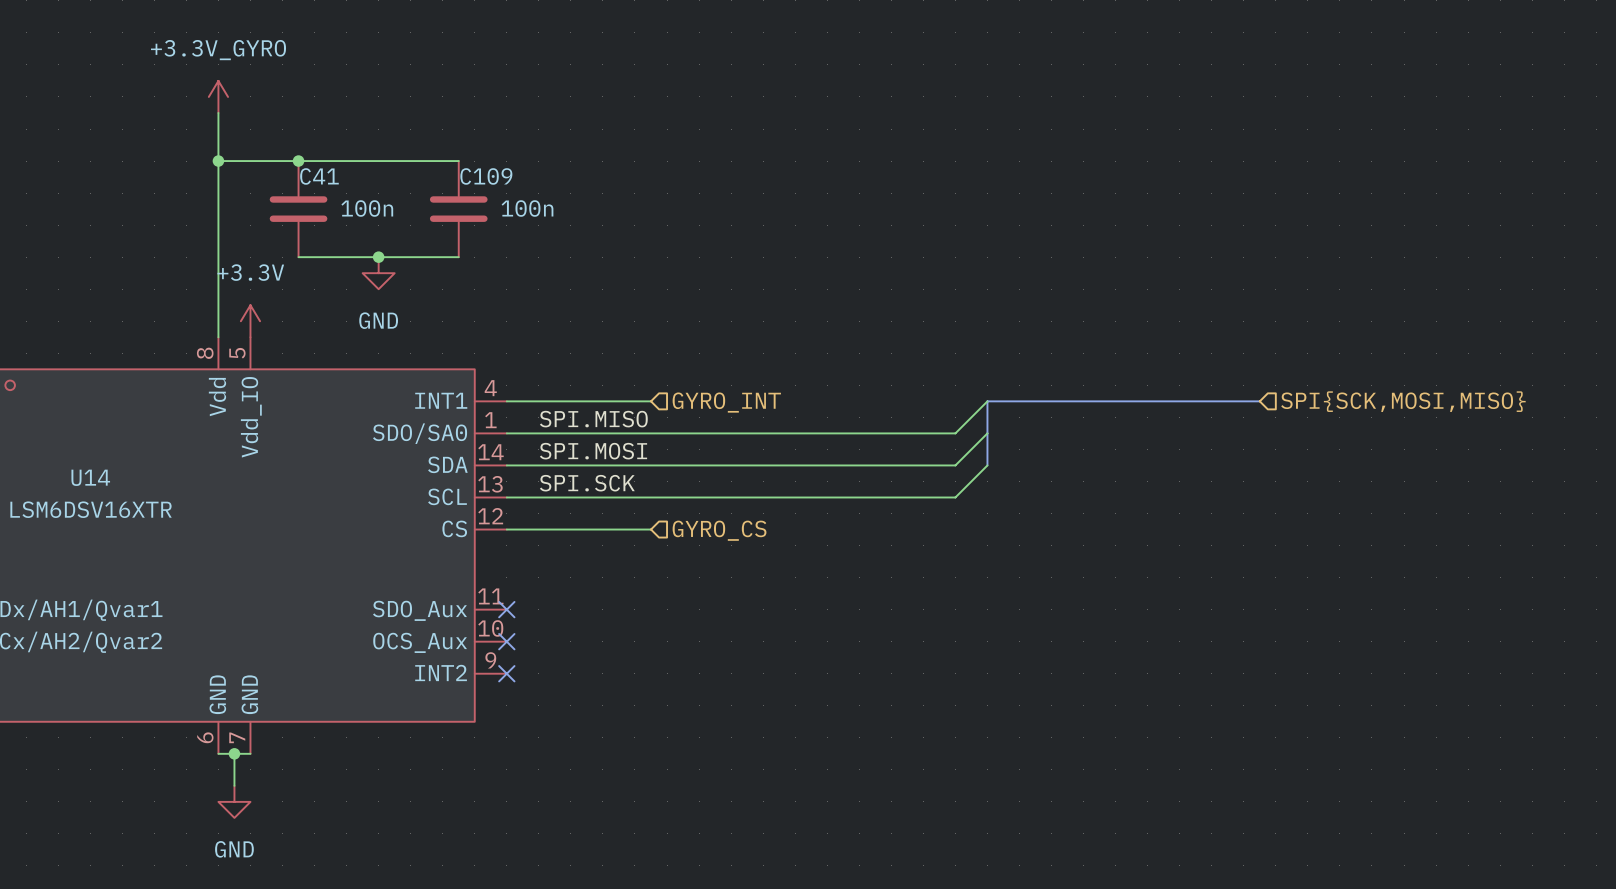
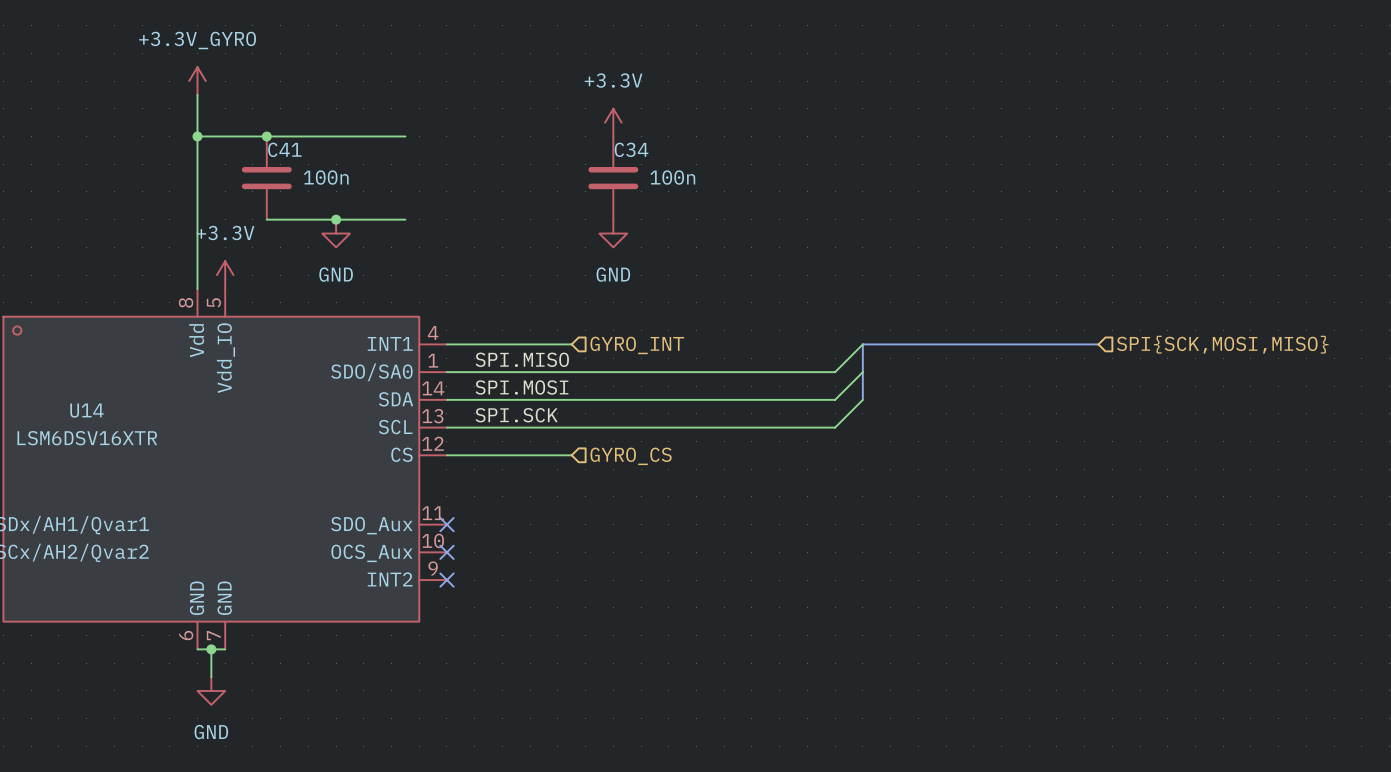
power symbol: none -> +3.3V (613, 122)
C109: 100n (458, 209) -> none
C34: none -> 100n (613, 178)
power symbol: none -> GND (613, 233)

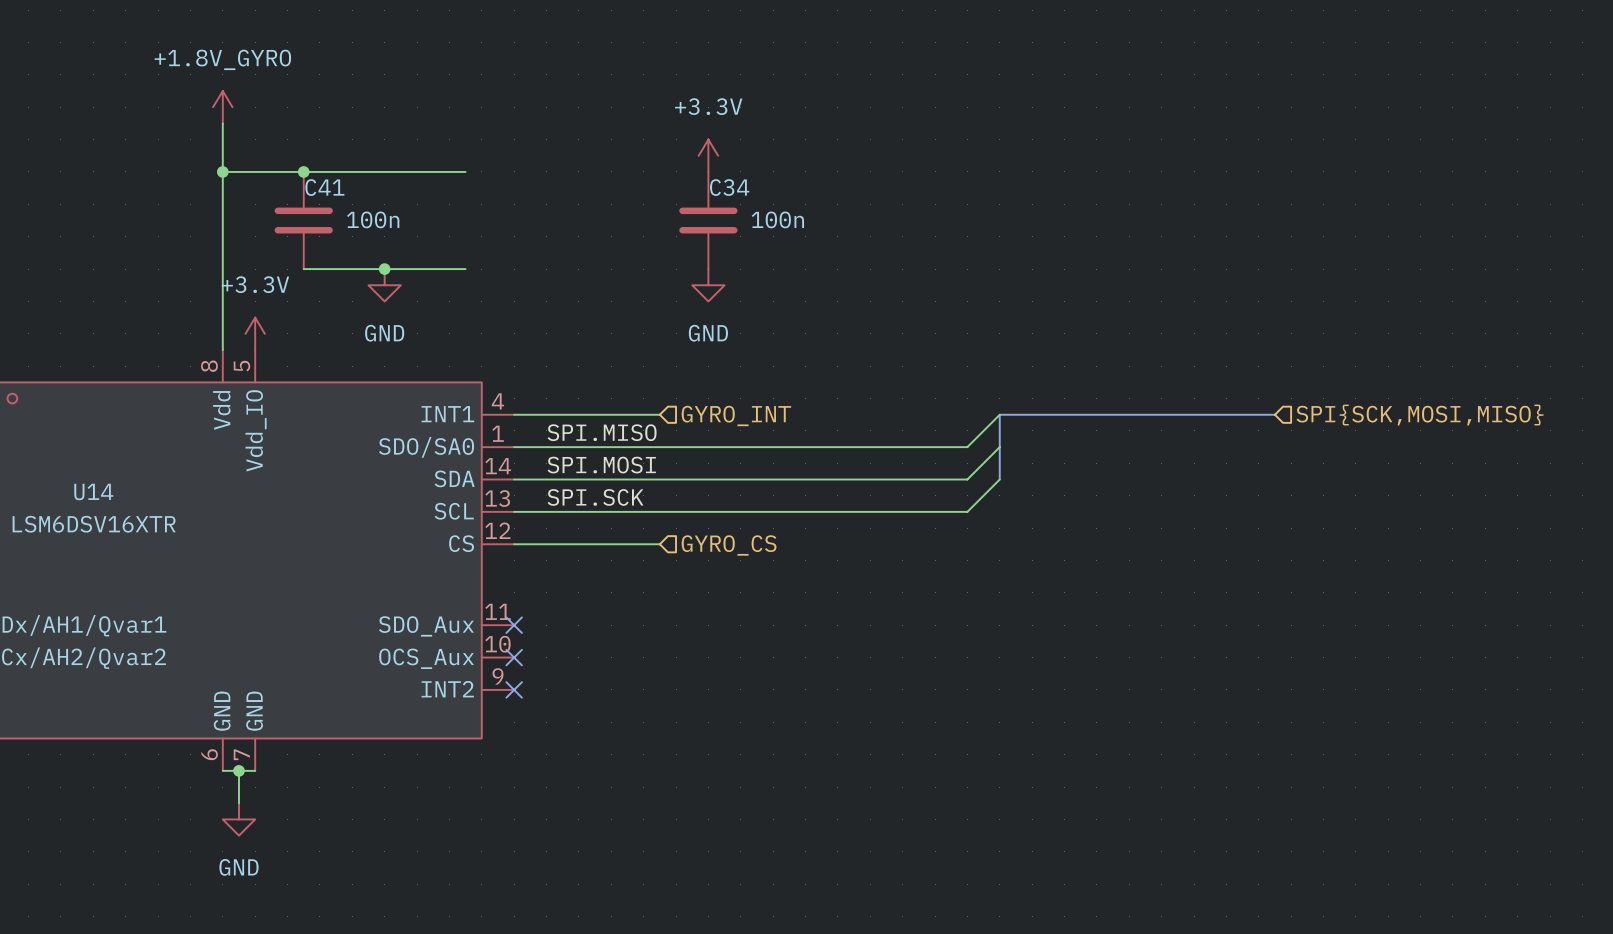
power symbol: +3.3V_GYRO (197, 81) -> +1.8V_GYRO (222, 107)

